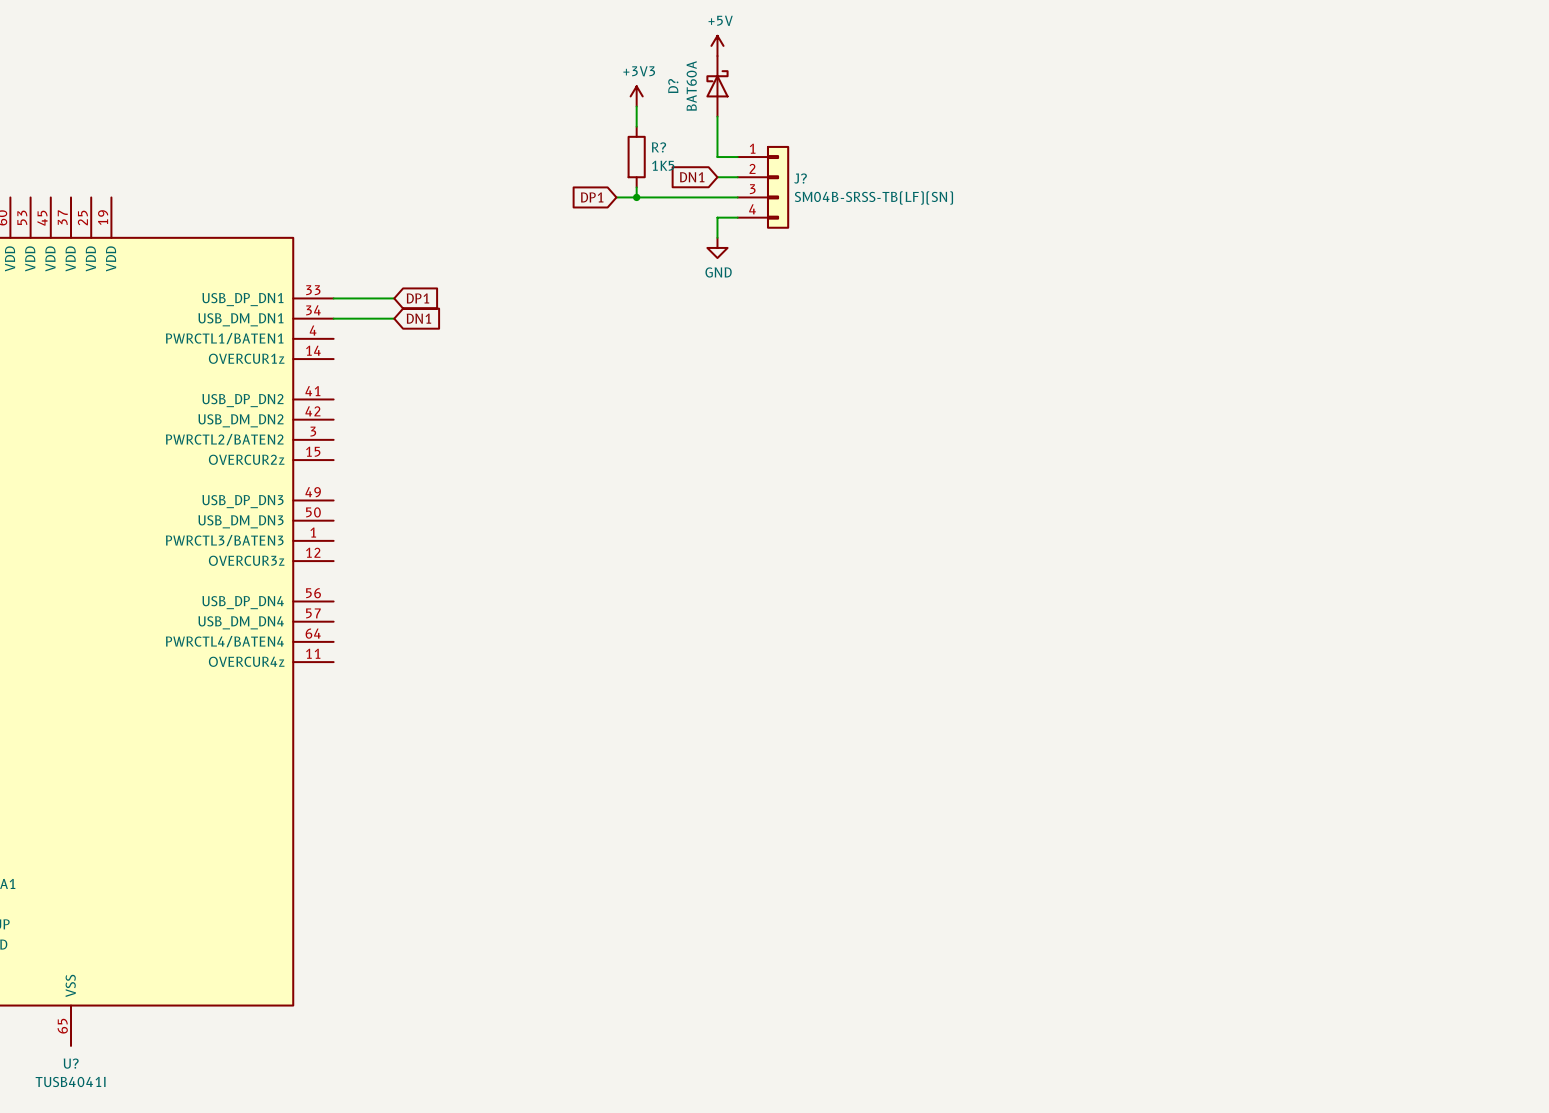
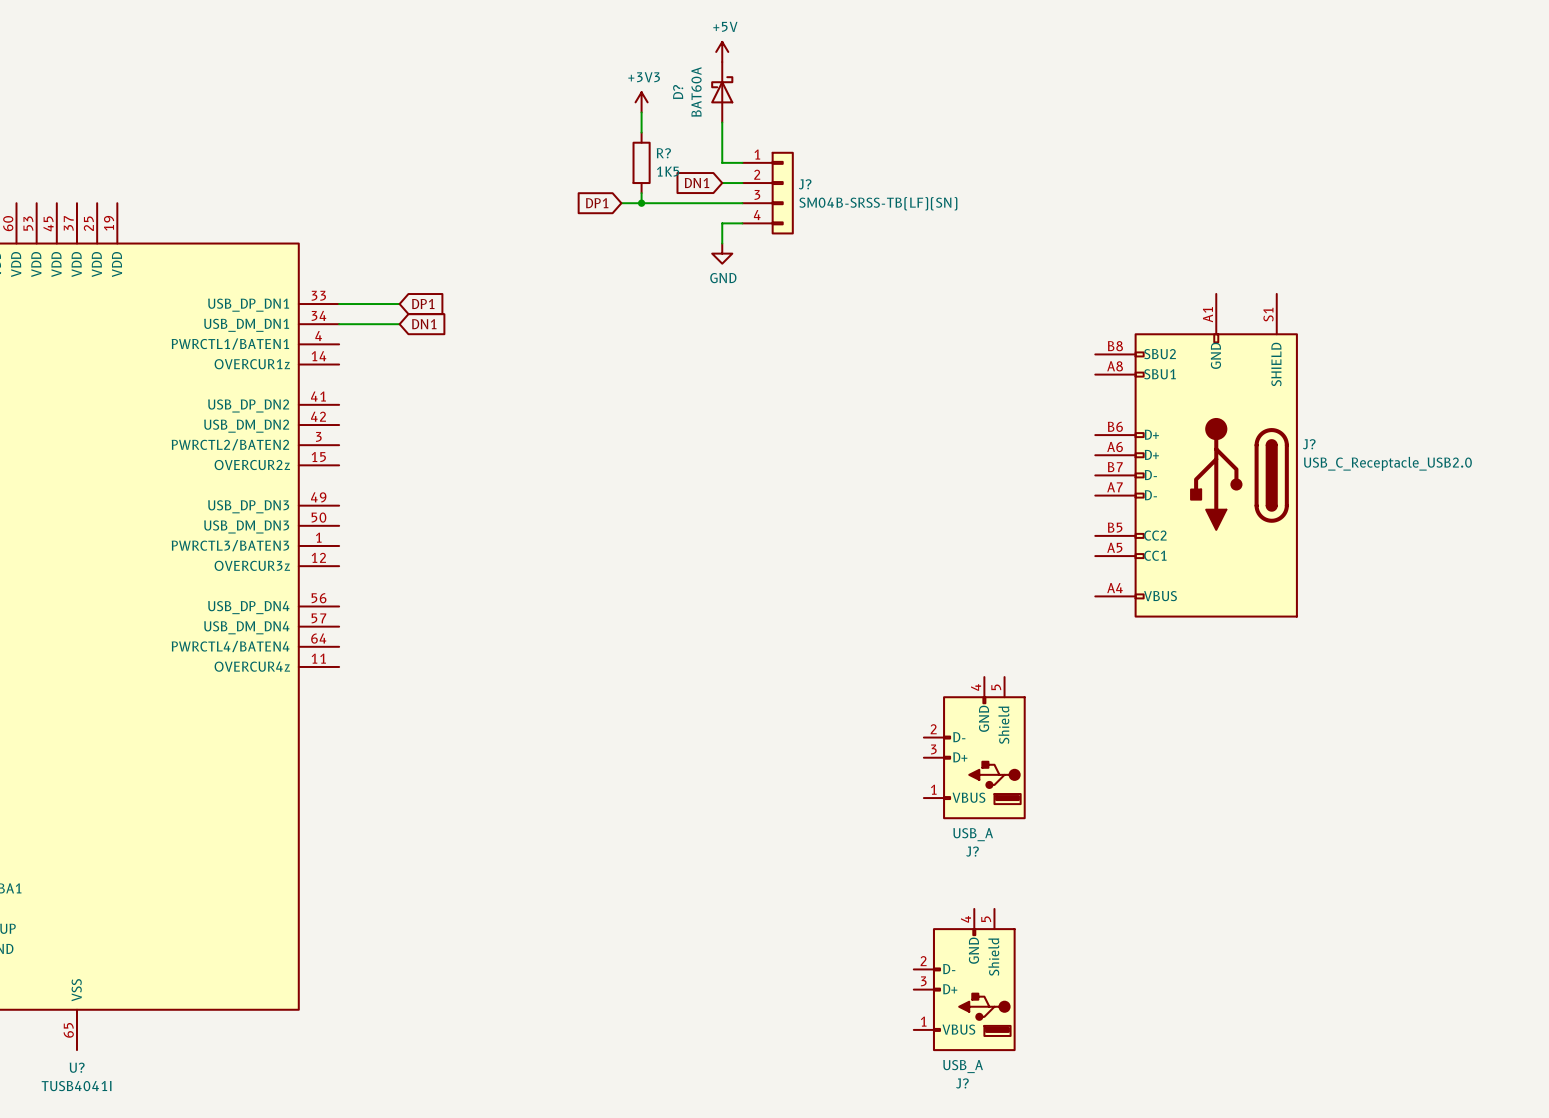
J?: none -> USB_C_Receptacle_USB2.0 (1196, 455)
J?: none -> USB_A (974, 748)
J?: none -> USB_A (964, 980)

